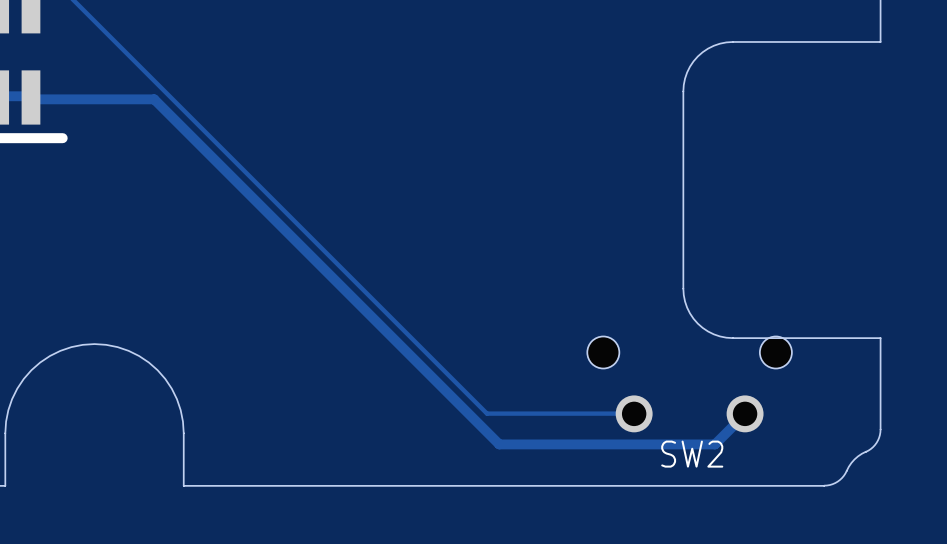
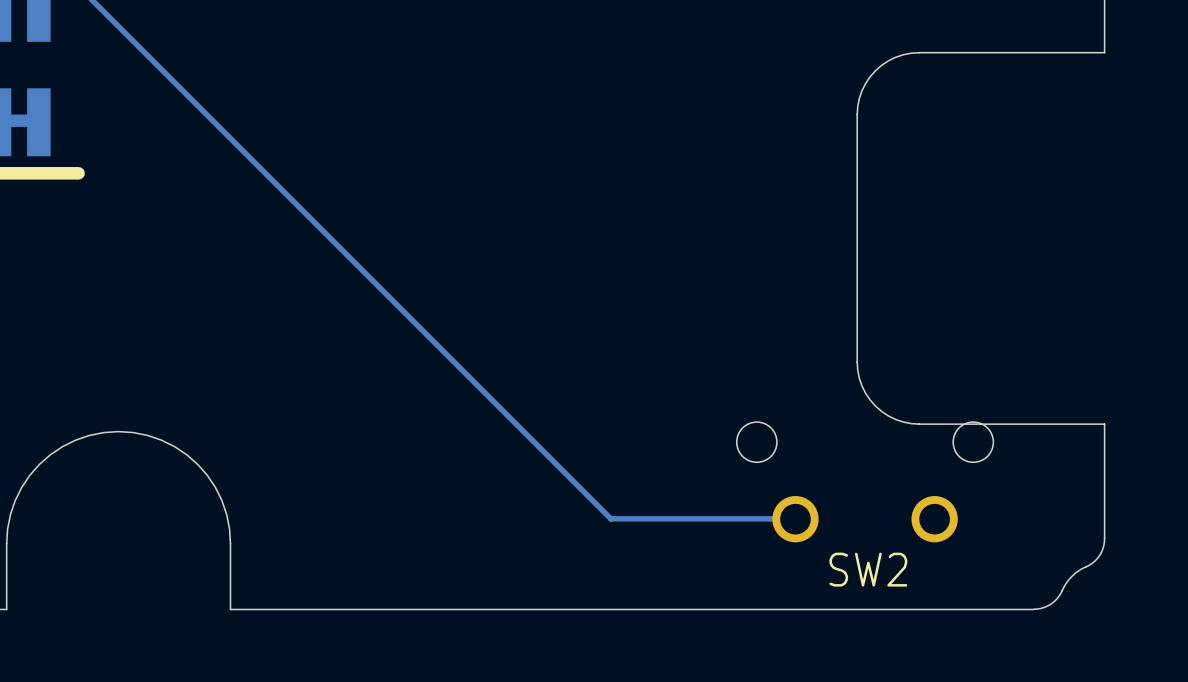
track: (30, 97) (34, 99) (154, 99) (499, 444) (714, 444) (745, 413) -> none

